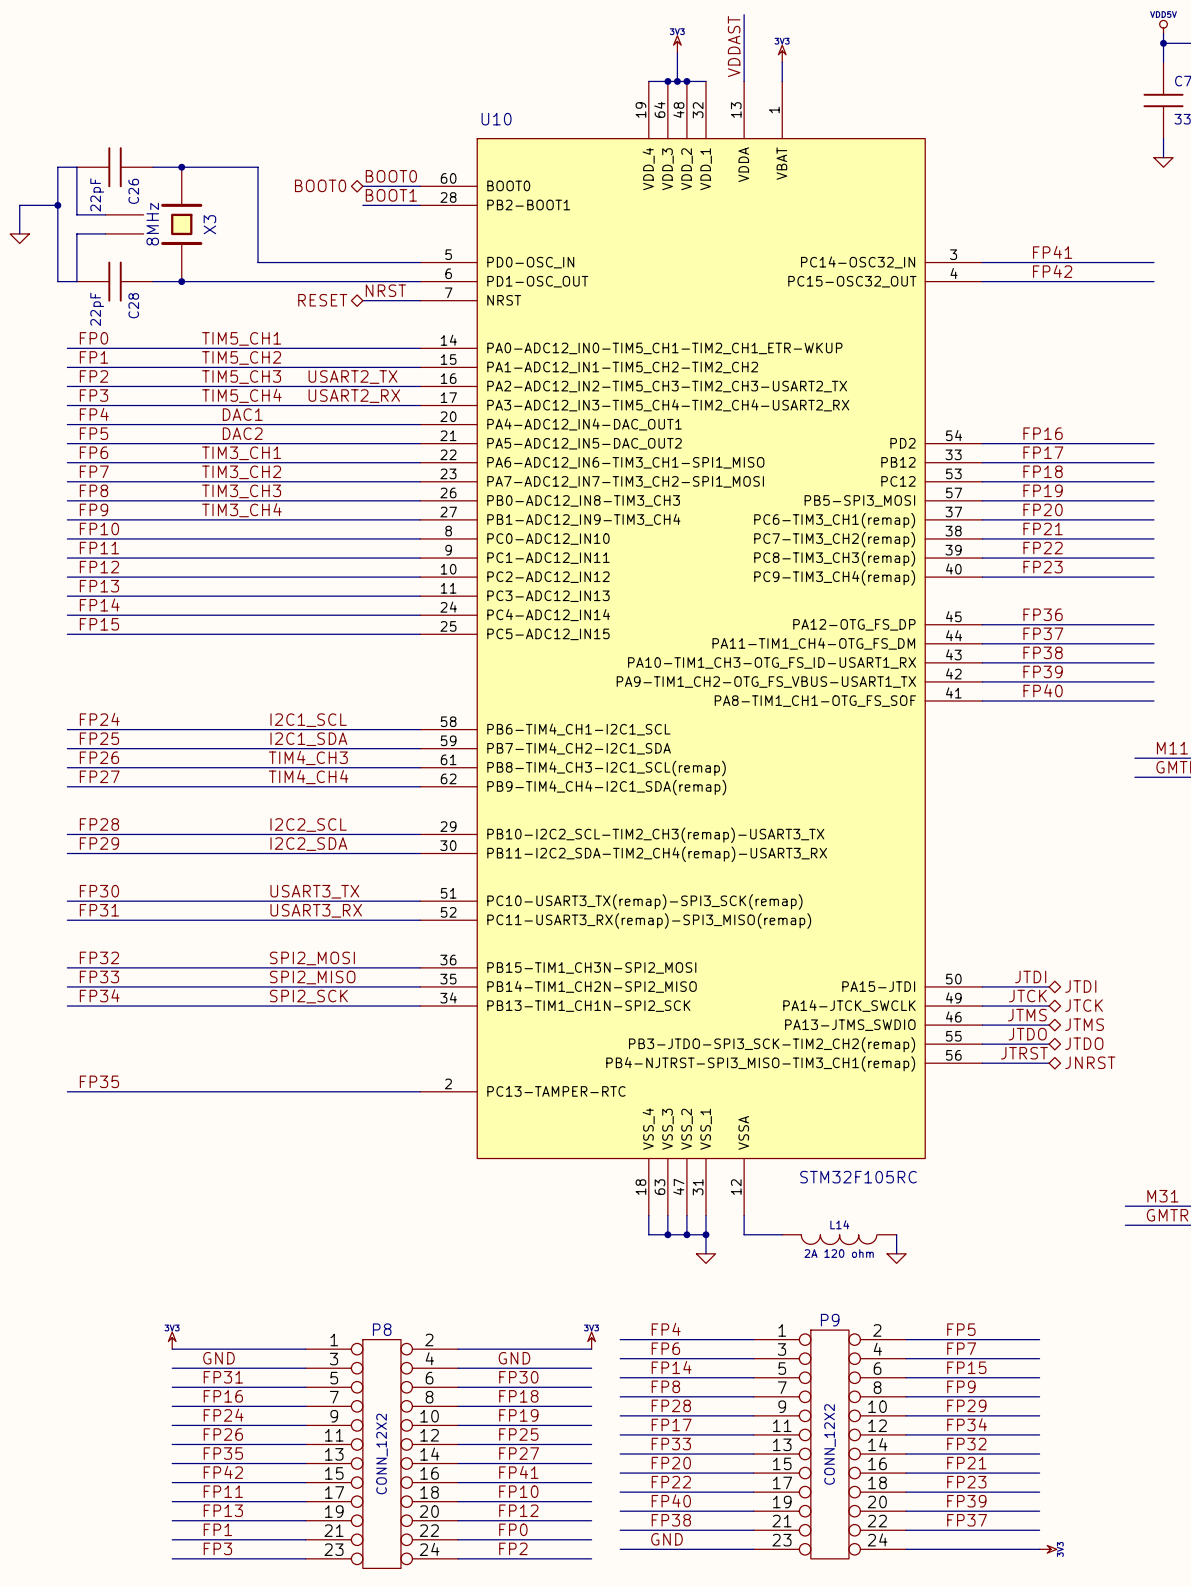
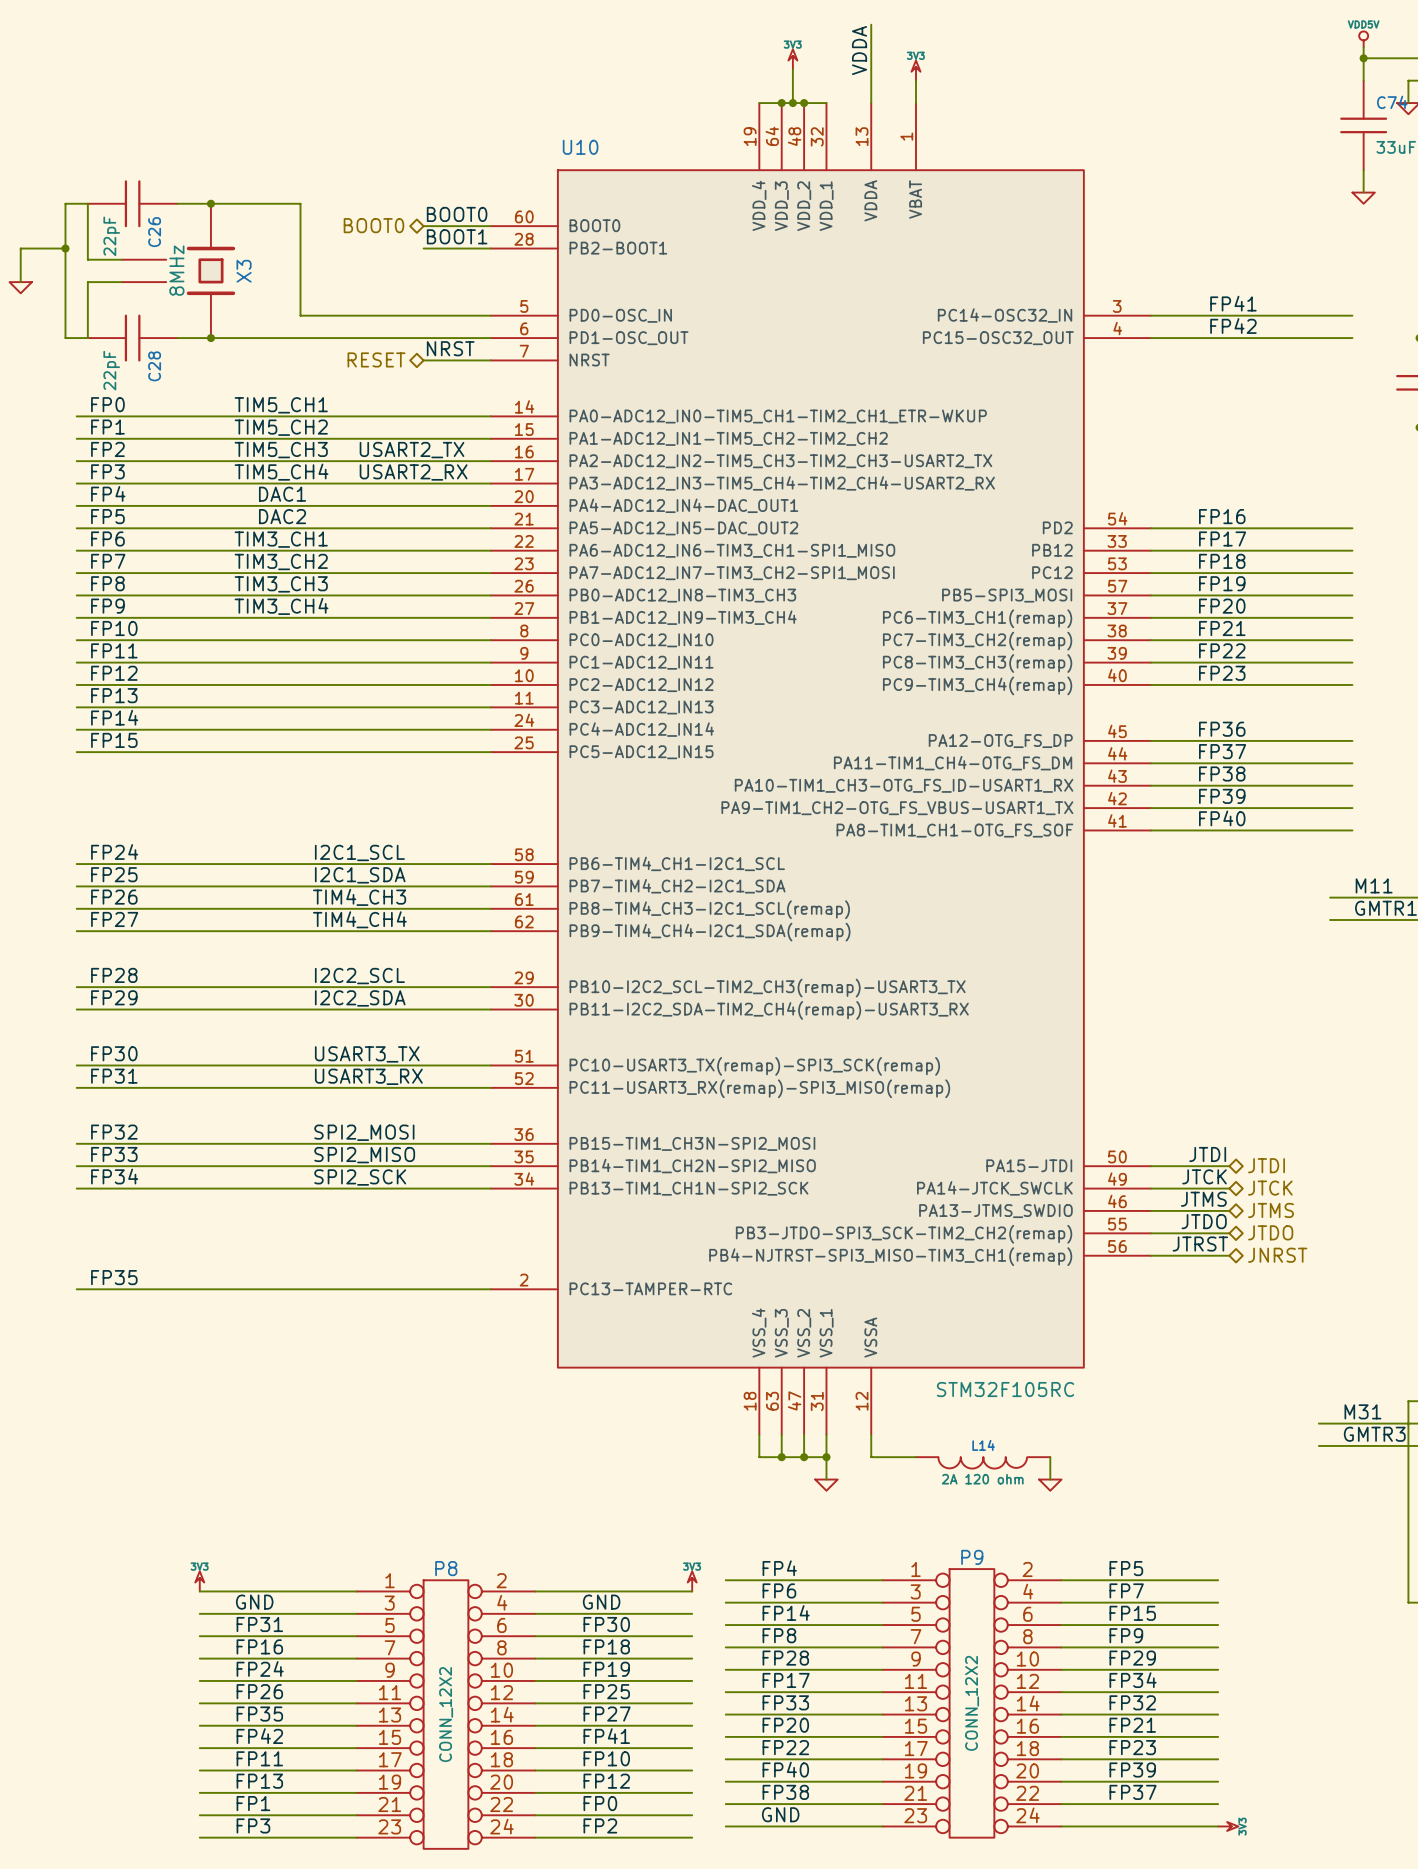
label: VDDAST (734, 46) -> VDDA (859, 50)

